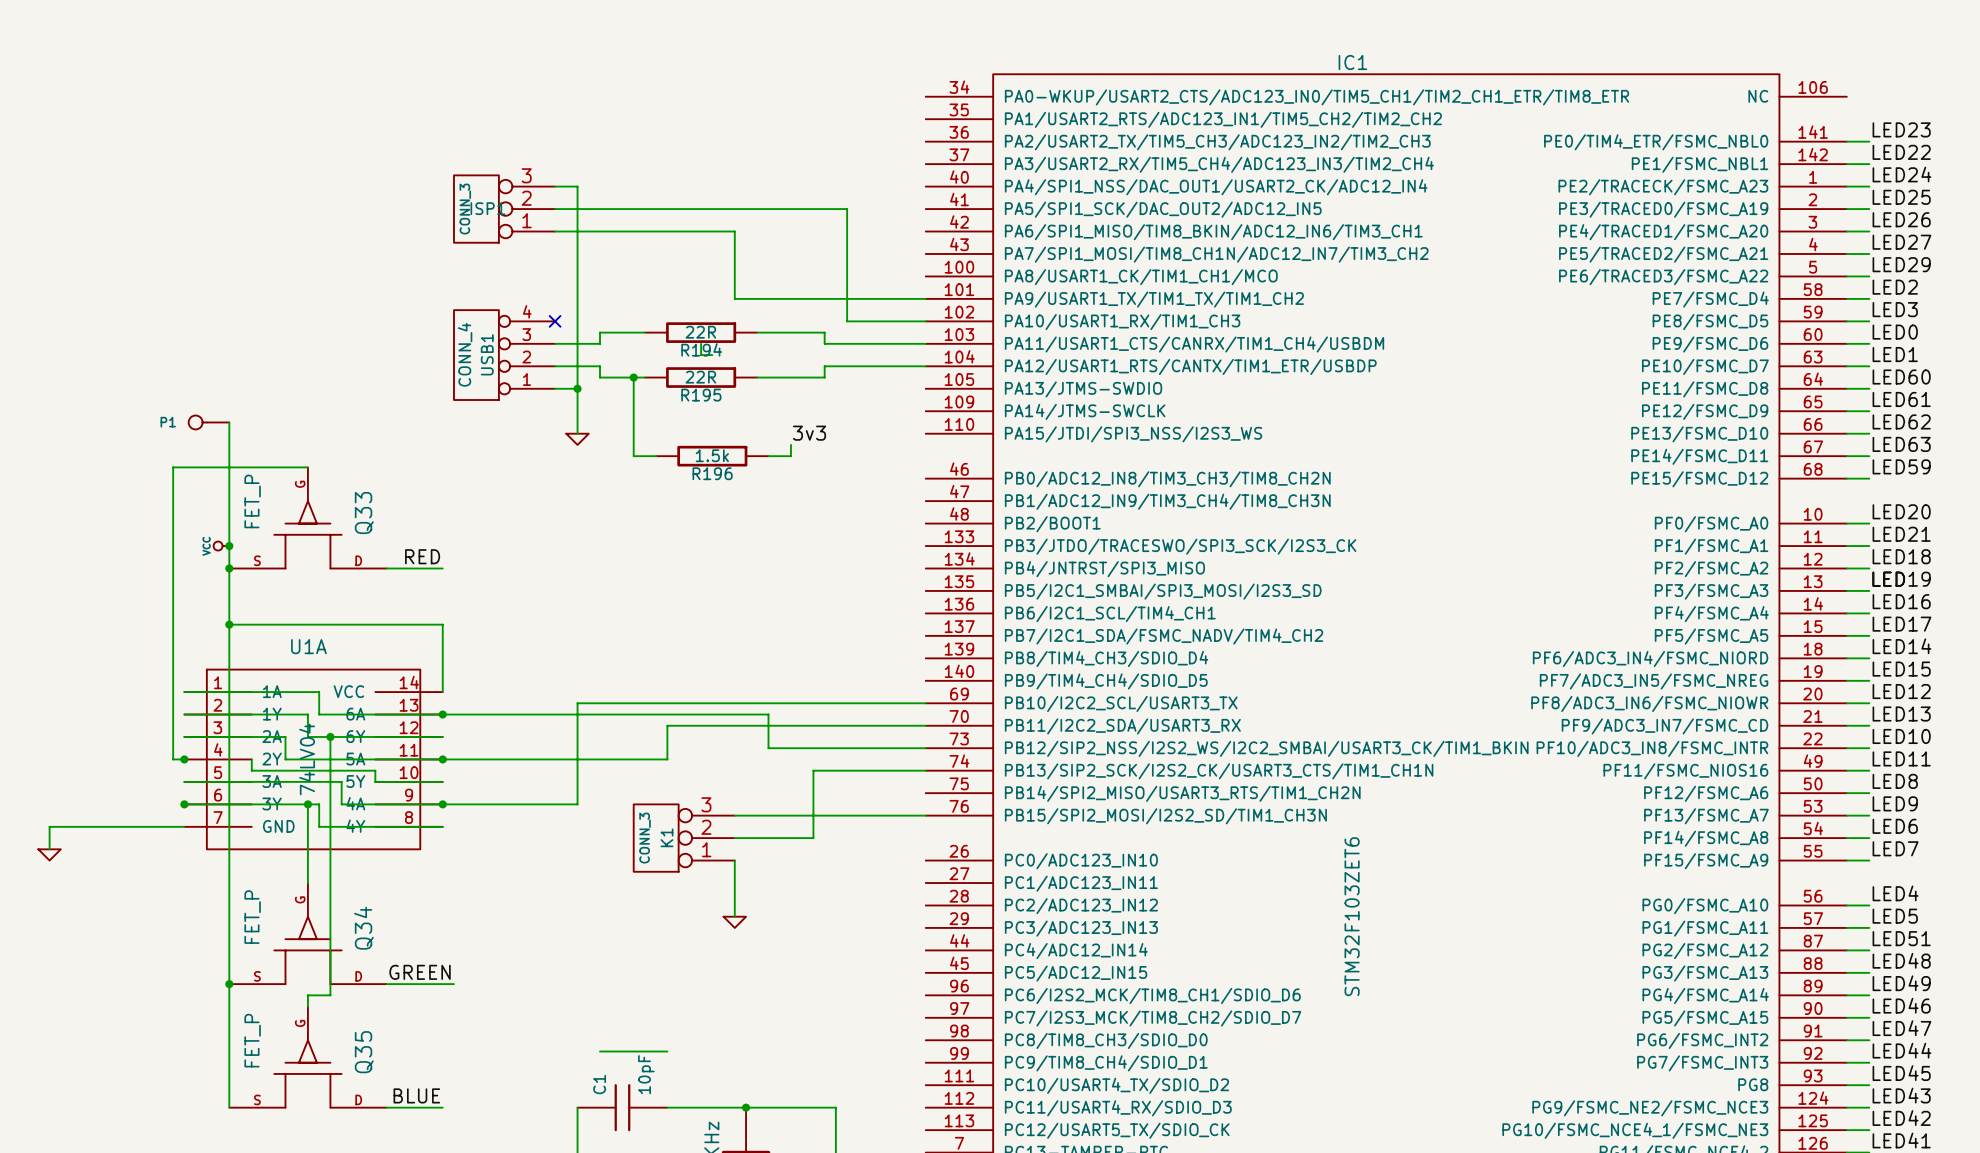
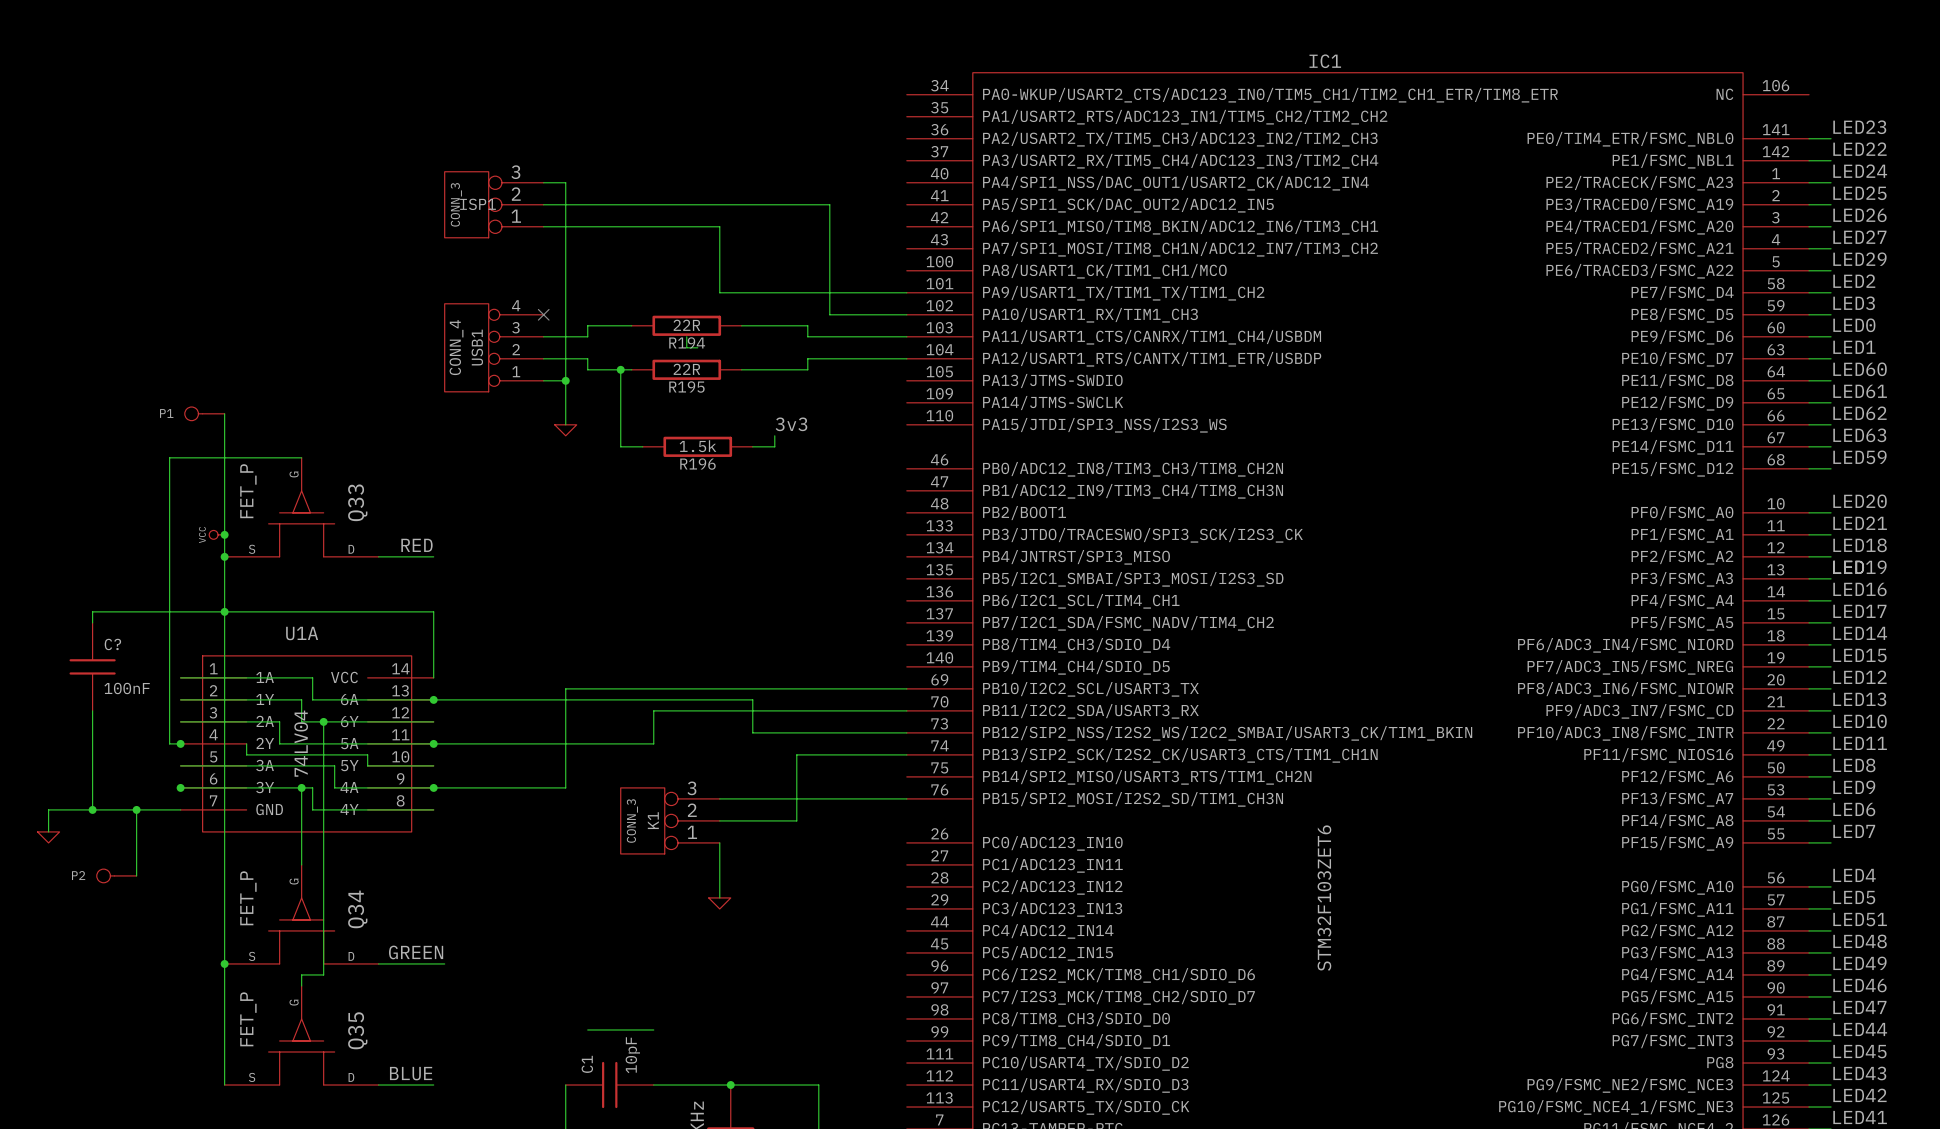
wire: none -> (224, 611) (92, 611) (92, 622)
C?: none -> 100nF (92, 666)
wire: none -> (92, 710) (92, 809)
junction: none -> (92, 809)
wire: none -> (136, 809) (136, 875)
junction: none -> (136, 809)
P2: none -> (116, 875)

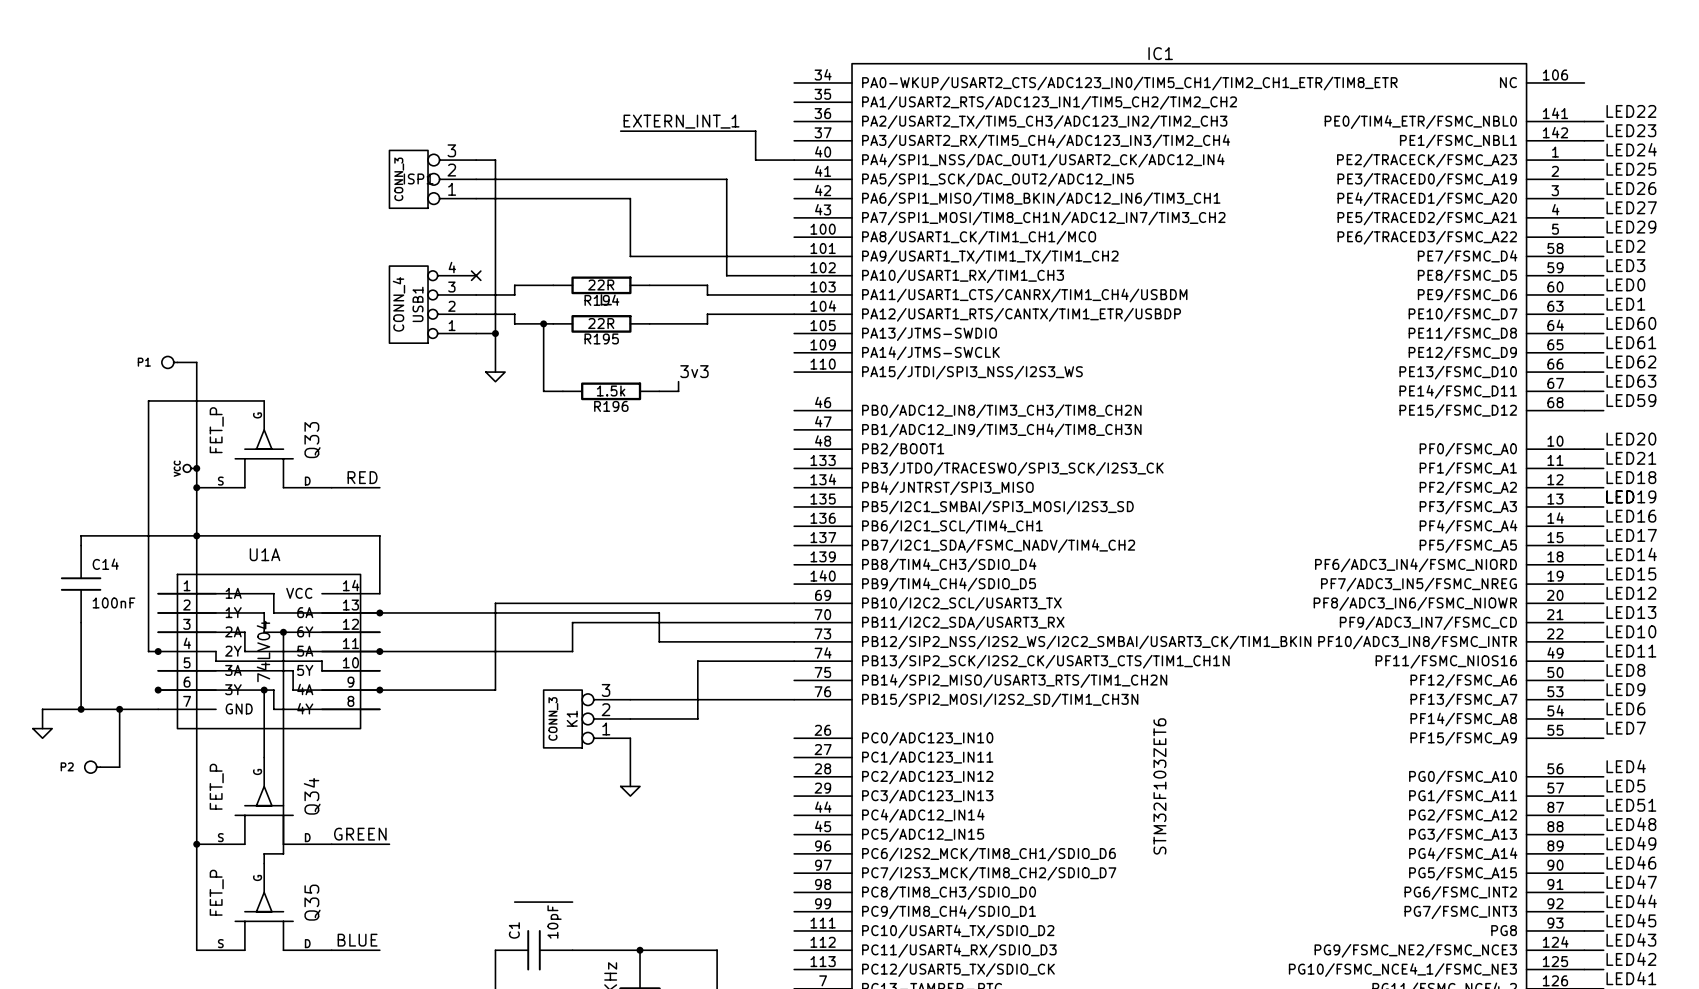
label: LED23 (1859, 127) -> LED22 (1631, 111)
label: none -> EXTERN_INT_1 (681, 121)
wire: none -> (620, 131) (755, 131) (755, 160) (794, 160)
label: LED22 (1859, 149) -> LED23 (1631, 130)
C? name: C? (112, 644) -> C14 (105, 564)

